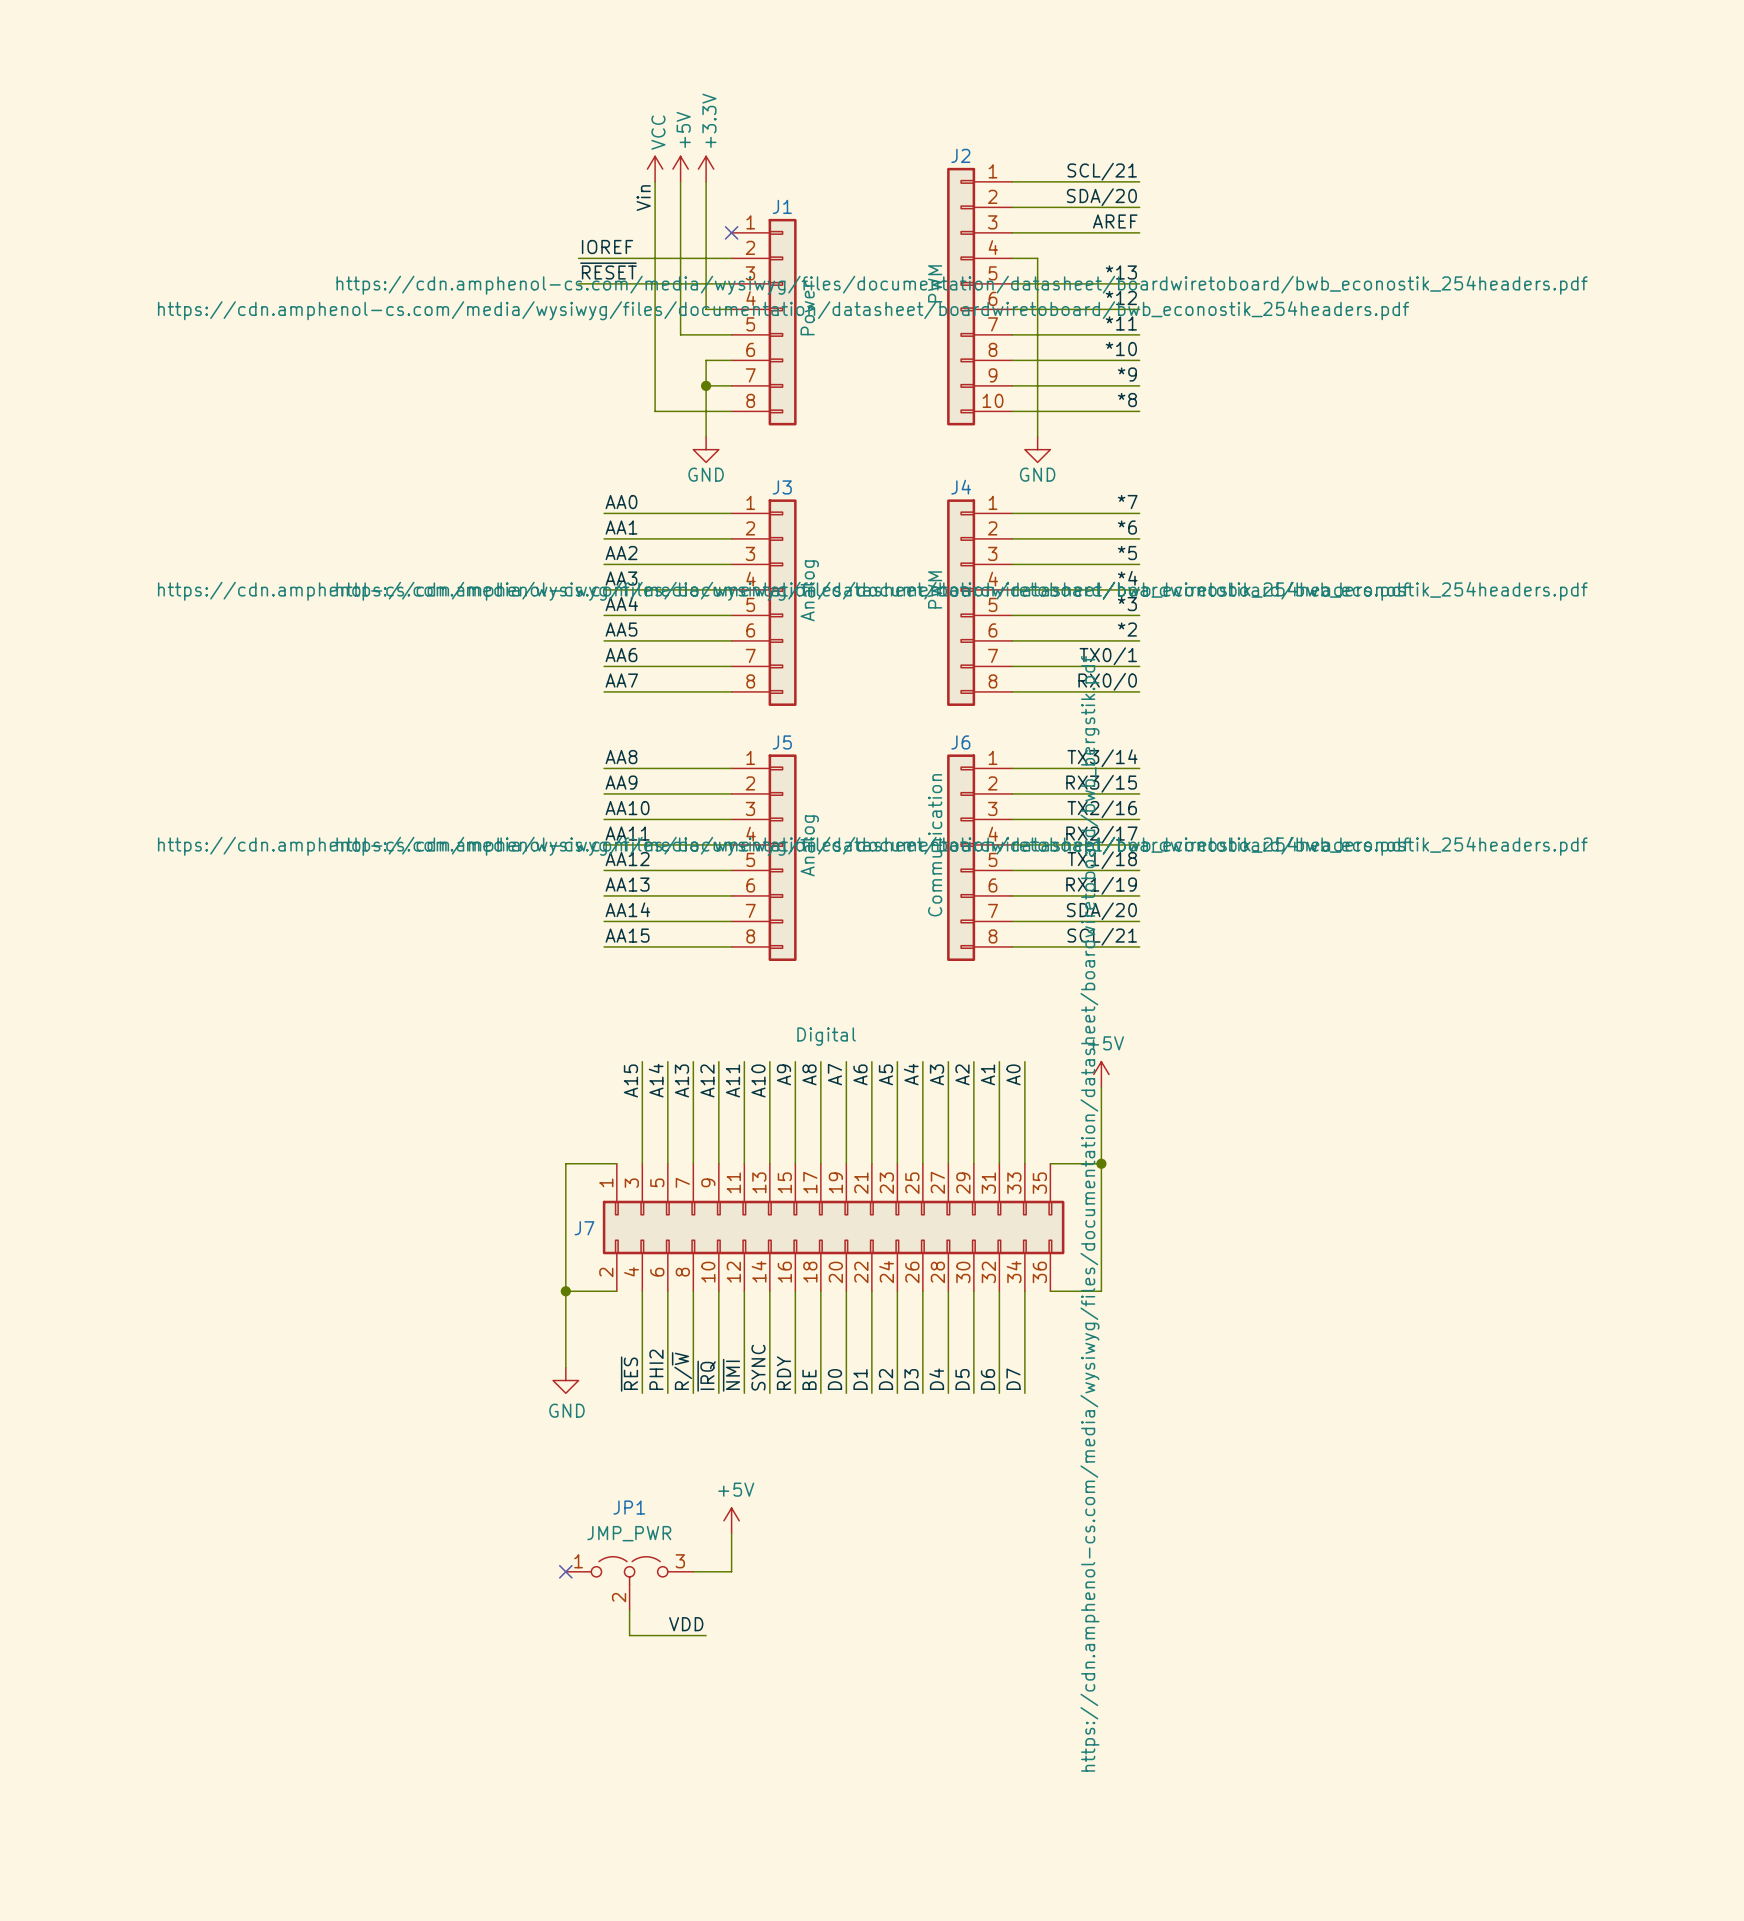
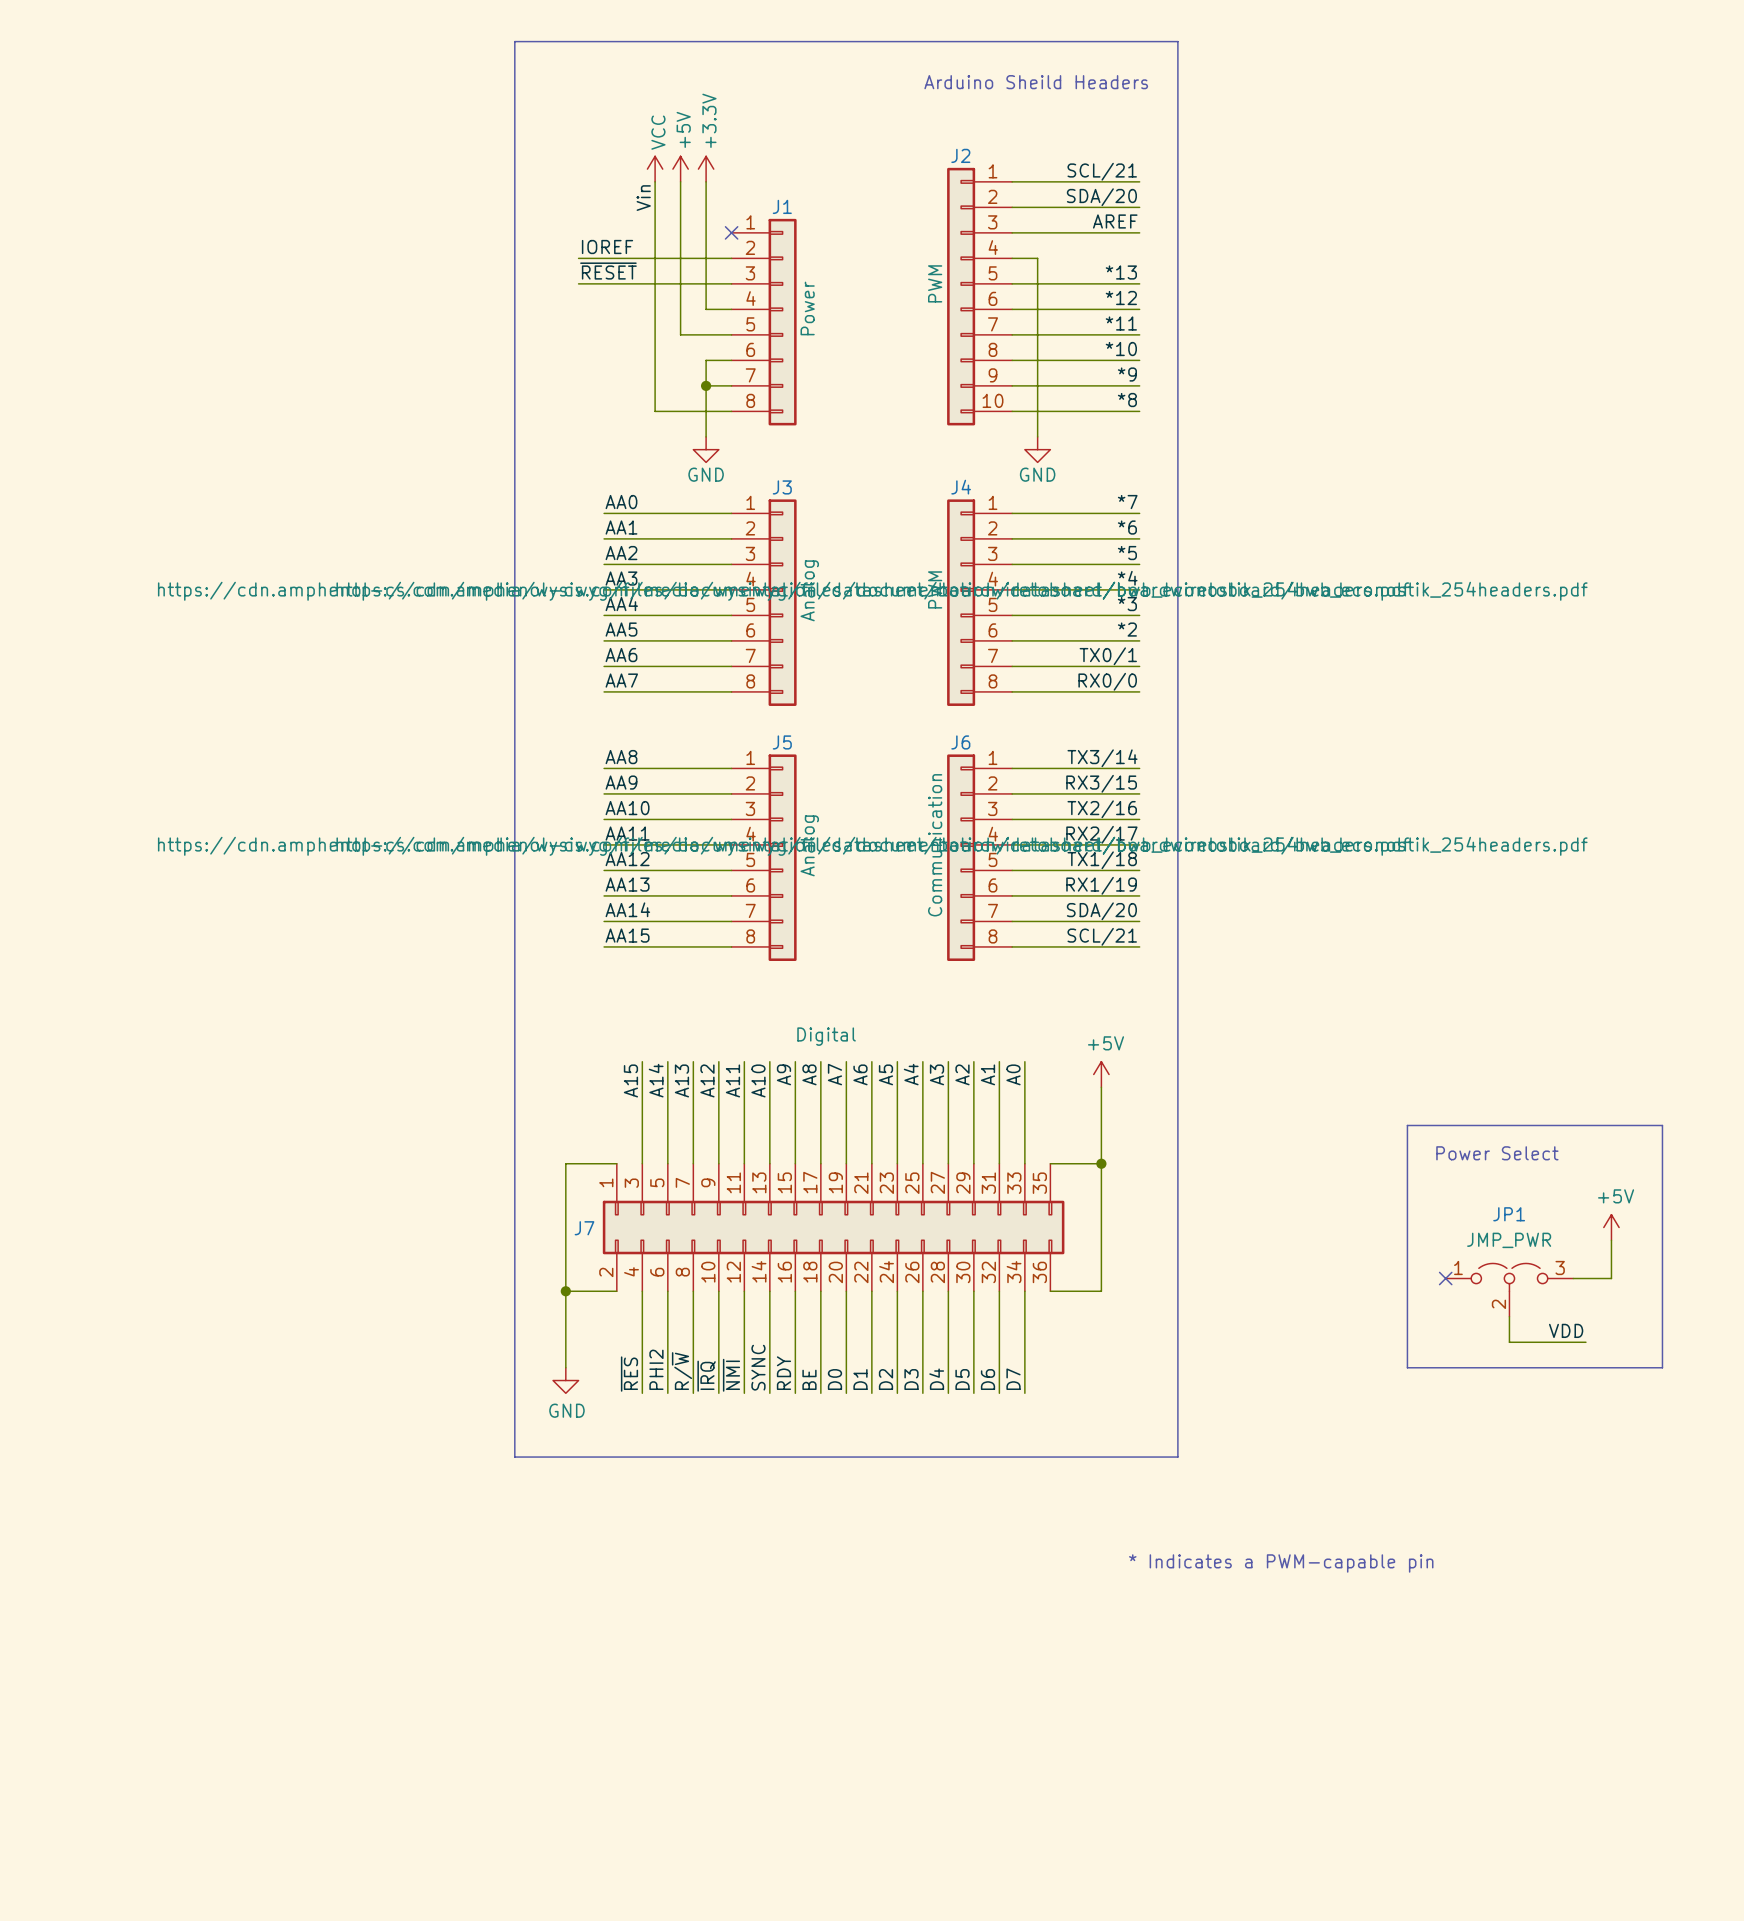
line: none -> (514, 41) (514, 1457) (1177, 1457) (1177, 41) (514, 41)
text: none -> Arduino Sheild Headers (1036, 82)
J2 text: https://cdn.amphenol-cs.com/media/wysiwyg/files/documentation/datasheet/boardwiretoboard/bwb_econostik_254headers.pdf (962, 285) -> none
J1 text: https://cdn.amphenol-cs.com/media/wysiwyg/files/documentation/datasheet/boardwiretoboard/bwb_econostik_254headers.pdf (783, 310) -> none
line: none -> (1407, 1125) (1407, 1367) (1662, 1367) (1662, 1125) (1407, 1125)
text: none -> Power Select (1497, 1153)
J7 text: https://cdn.amphenol-cs.com/media/wysiwyg/files/documentation/datasheet/boardwiretoboard/bwb_bergstik.pdf (1089, 1213) -> none
power symbol: none -> +5V (1611, 1227)
wire: none -> (1611, 1240) (1611, 1278) (1573, 1278)
no-connect mark: none -> (1445, 1278)
wire: none -> (1509, 1316) (1509, 1342) (1585, 1342)
label: none -> VDD (1566, 1330)
power symbol: +5V (731, 1520) -> none
wire: (731, 1533) (731, 1571) (693, 1571) -> none
text: none -> * Indicates a PWM-capable pin (1281, 1563)
no-connect mark: (565, 1571) -> none
JP1 position: (629, 1583) -> (1509, 1290)
wire: (629, 1610) (629, 1635) (706, 1635) -> none
label: VDD (686, 1624) -> none

